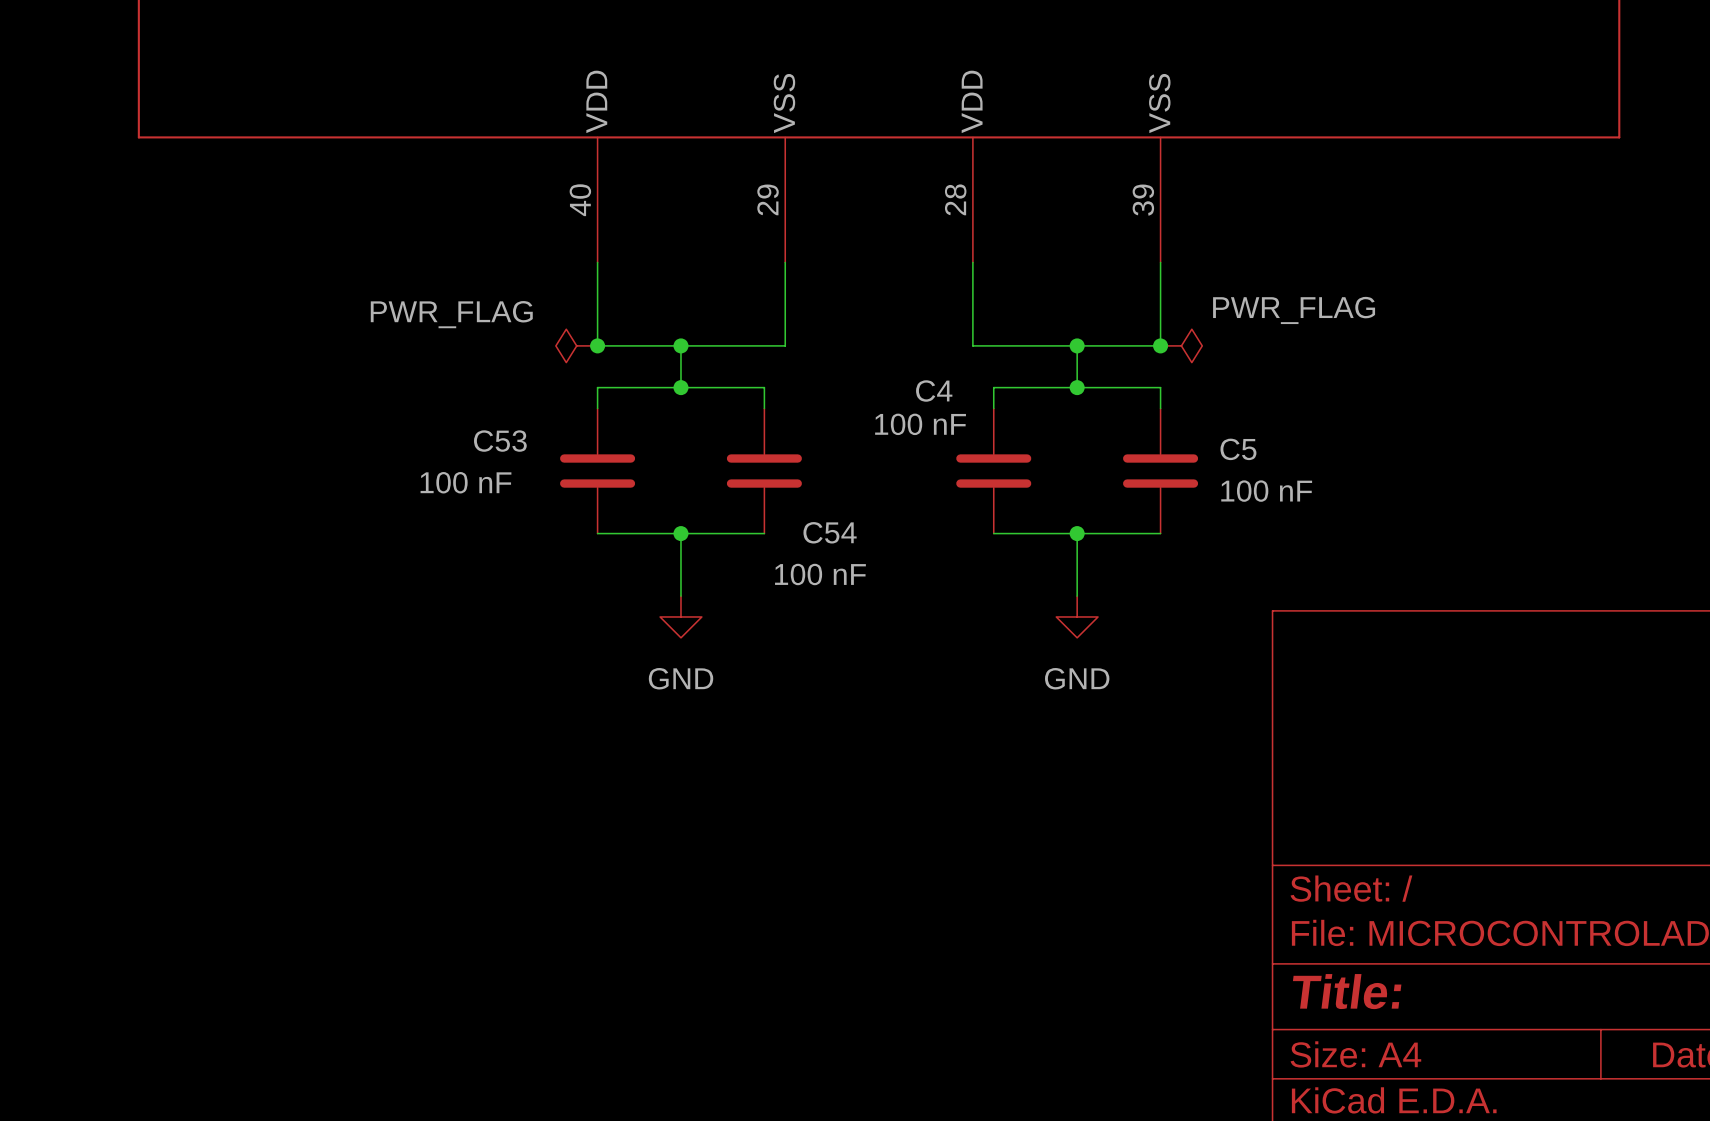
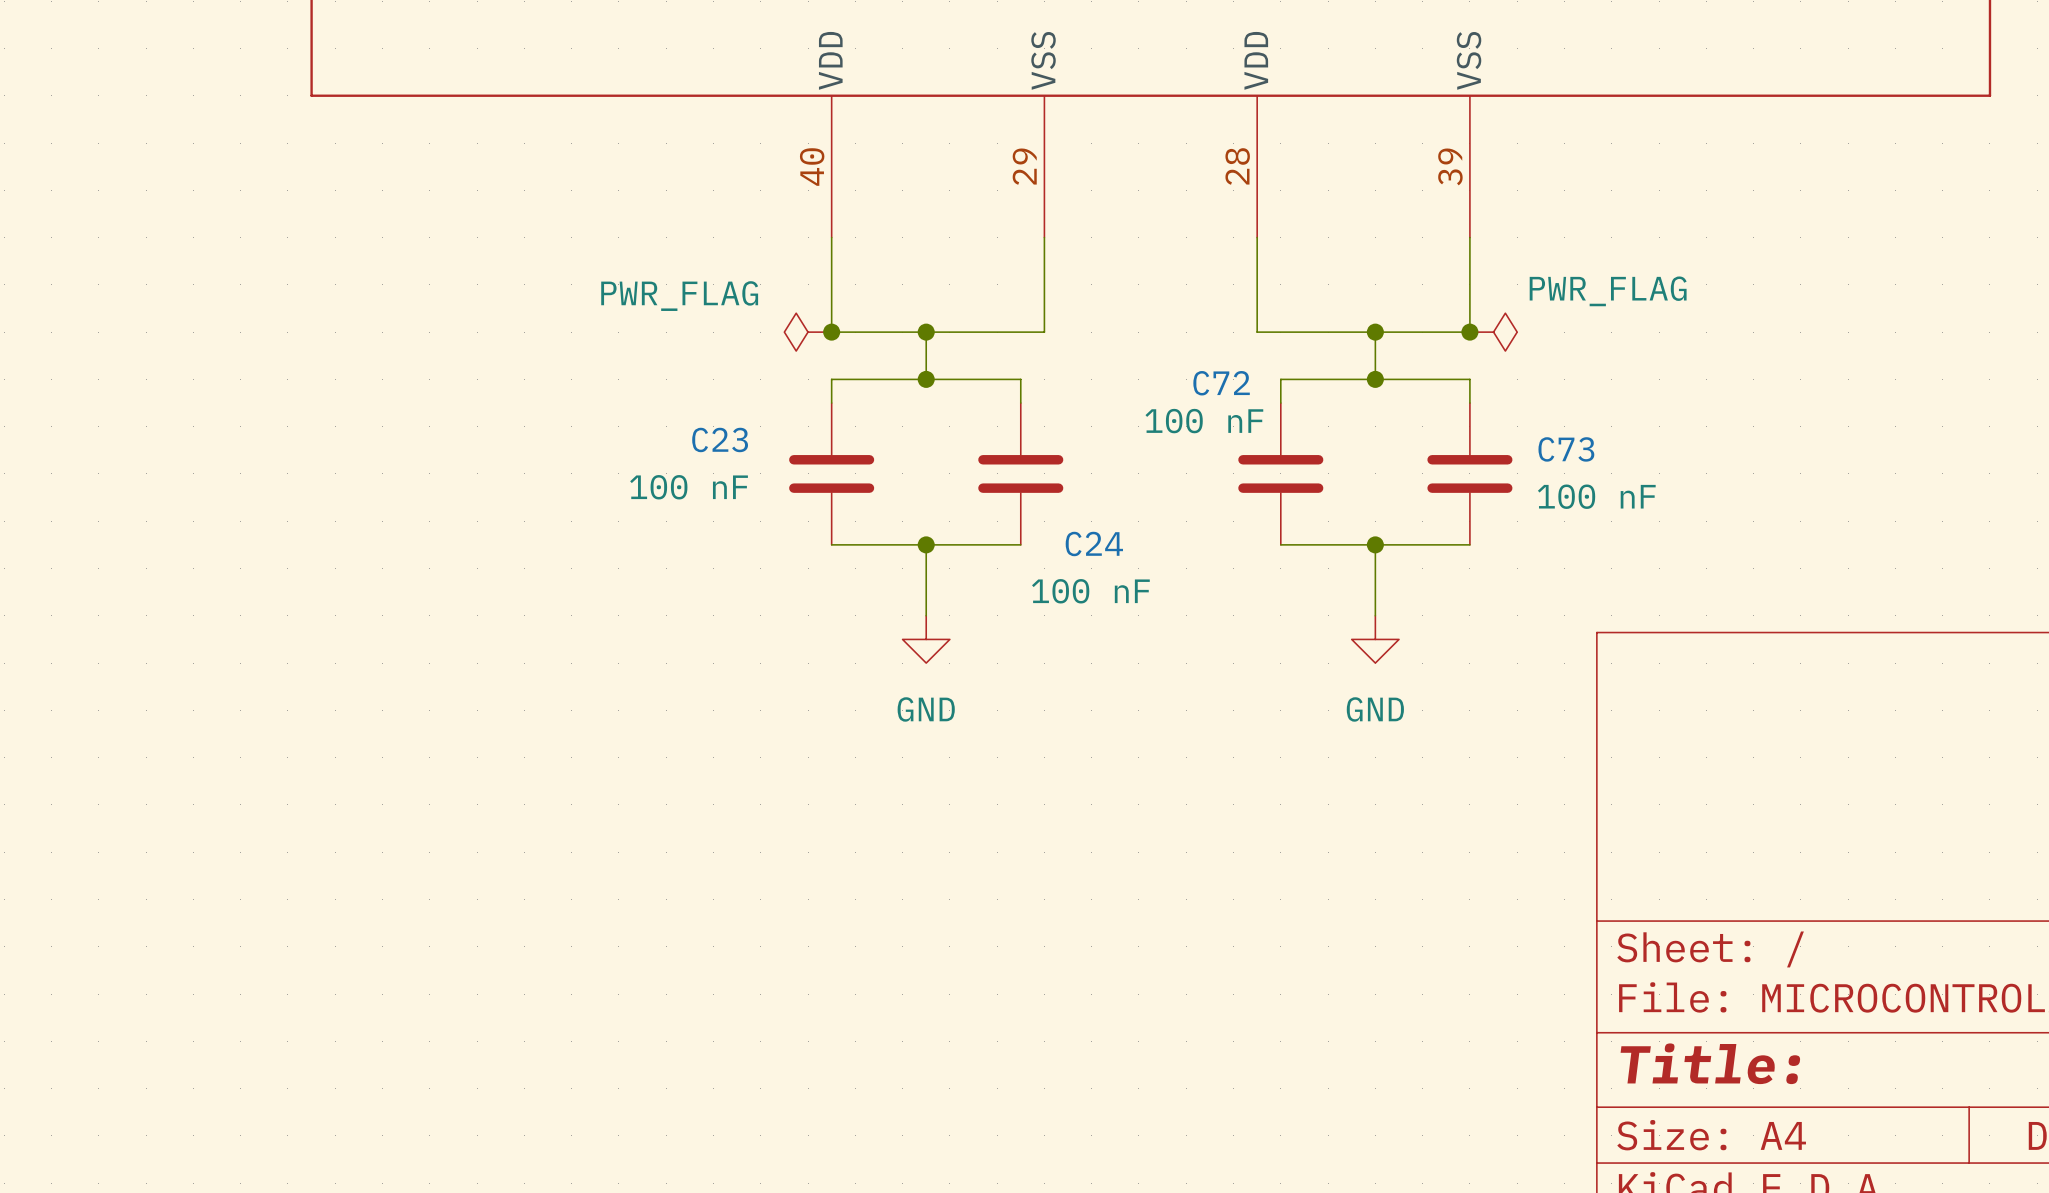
C4 name: C4 (934, 391) -> C72 (1221, 383)
C53 name: C53 (500, 441) -> C23 (720, 439)
C5 name: C5 (1238, 449) -> C73 (1566, 449)
C54 name: C54 (830, 532) -> C24 (1094, 543)

